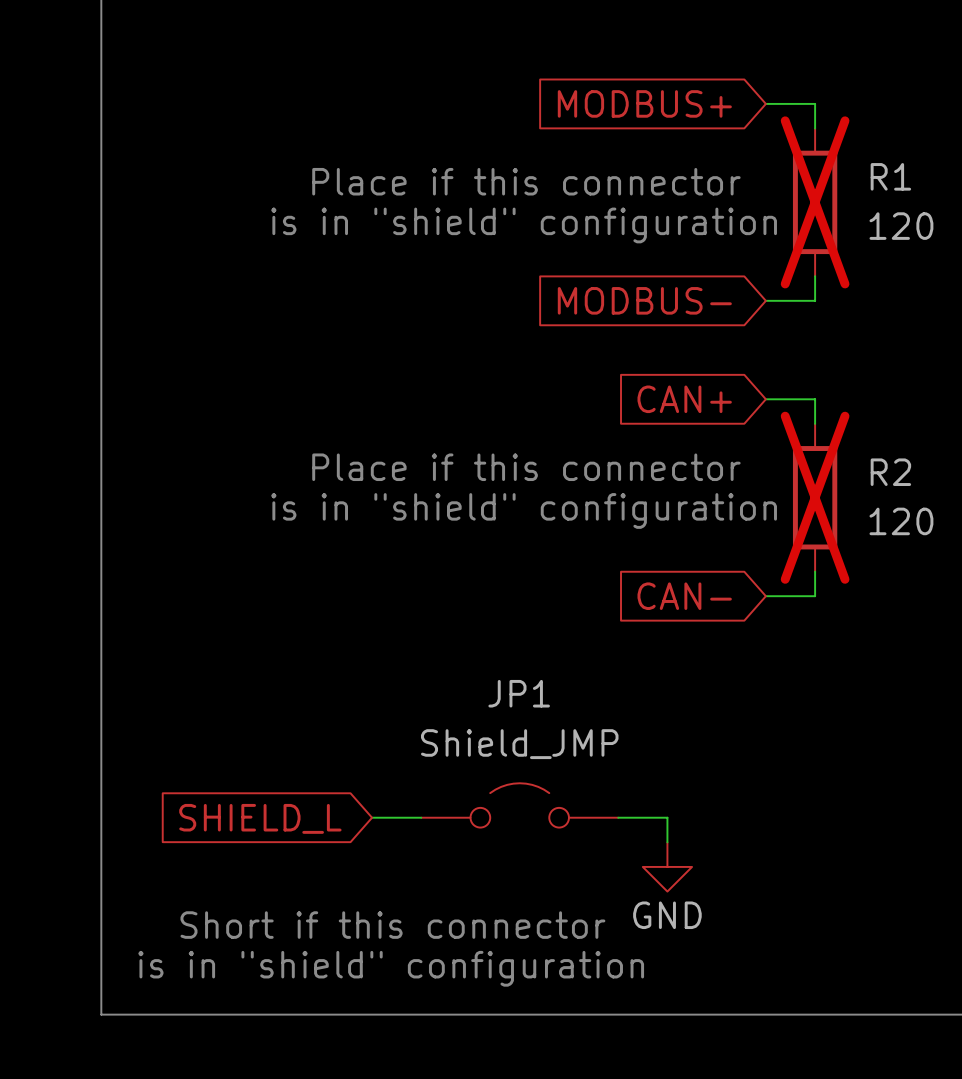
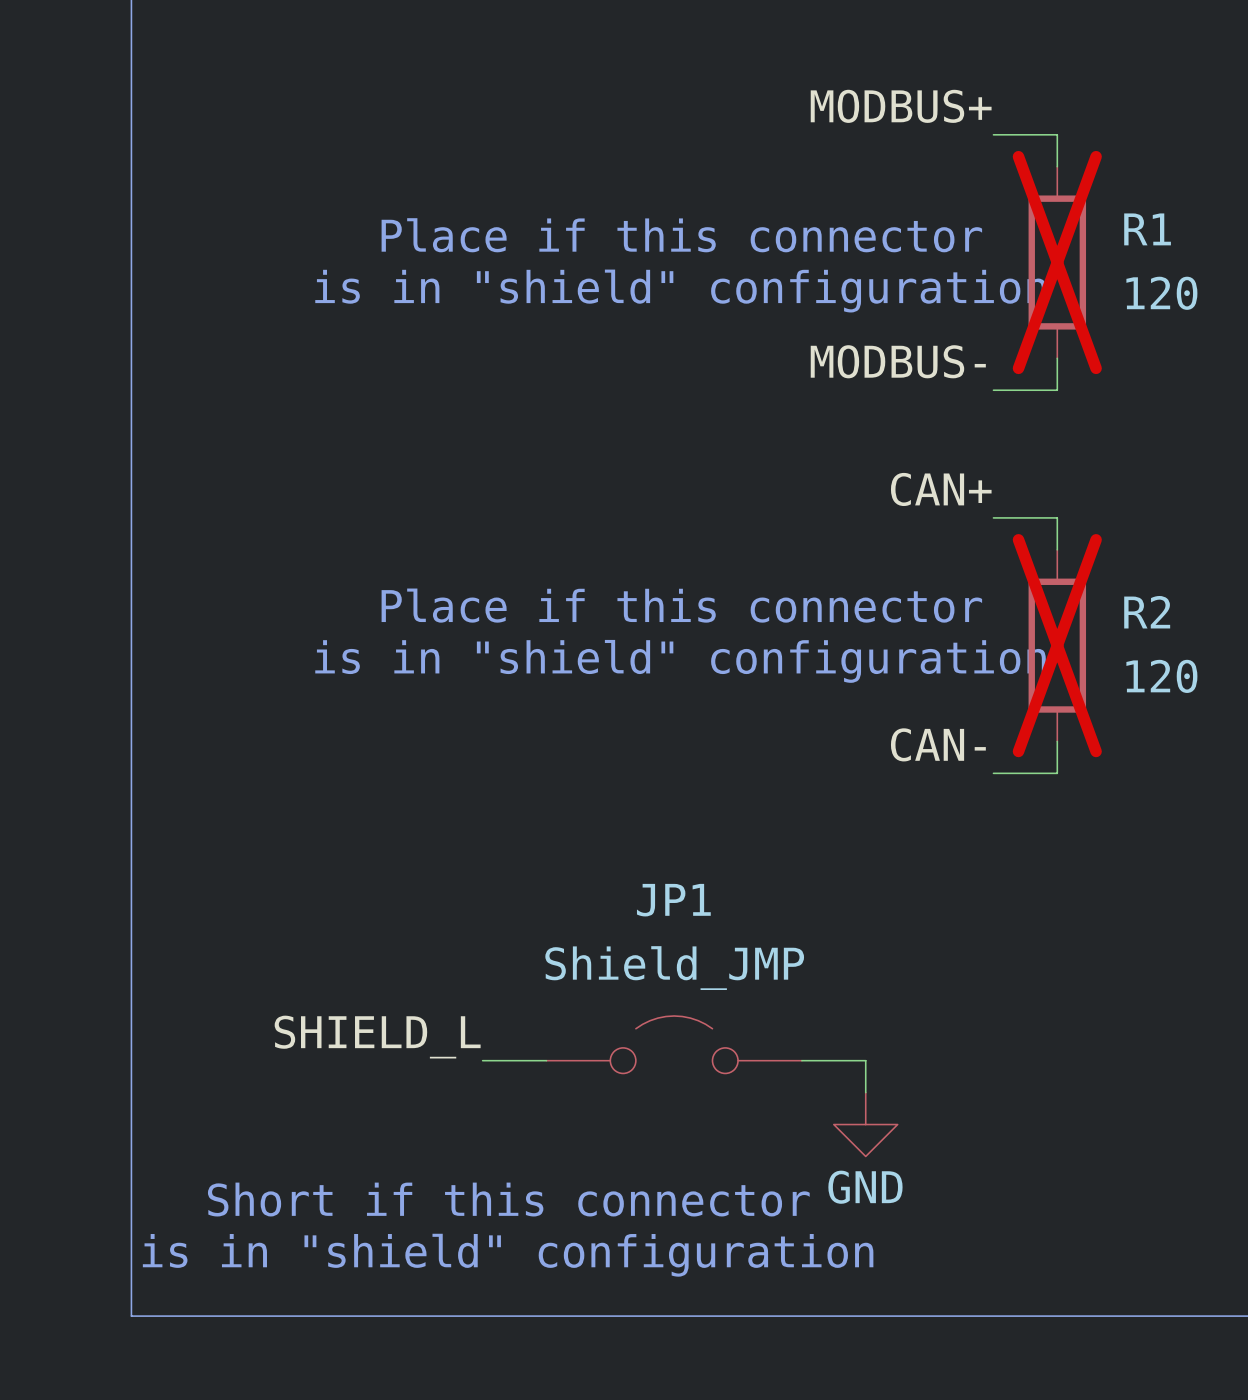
label: none -> MODBUS+ (901, 106)
global label: MODBUS+ (644, 103) -> none
label: none -> MODBUS- (898, 361)
global label: MODBUS- (644, 300) -> none
label: none -> CAN+ (941, 489)
global label: CAN+ (684, 399) -> none
label: none -> CAN- (938, 744)
global label: CAN- (684, 596) -> none
label: none -> SHIELD_L (377, 1037)
global label: SHIELD_L (260, 818) -> none

